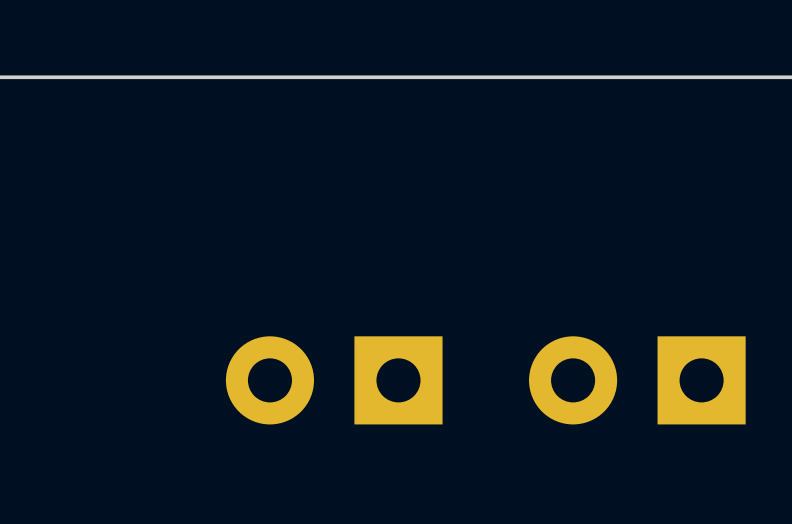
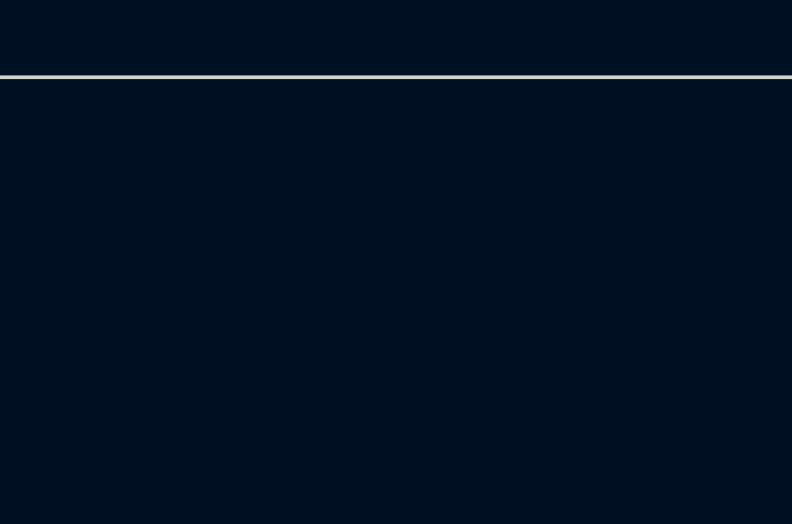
part: (334, 380) -> none
part: (637, 380) -> none

